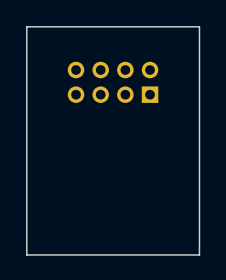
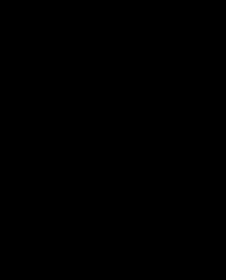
board edge: (199, 26) (26, 26) (26, 254) (199, 254) (199, 26) -> none
part: (113, 82) -> none

